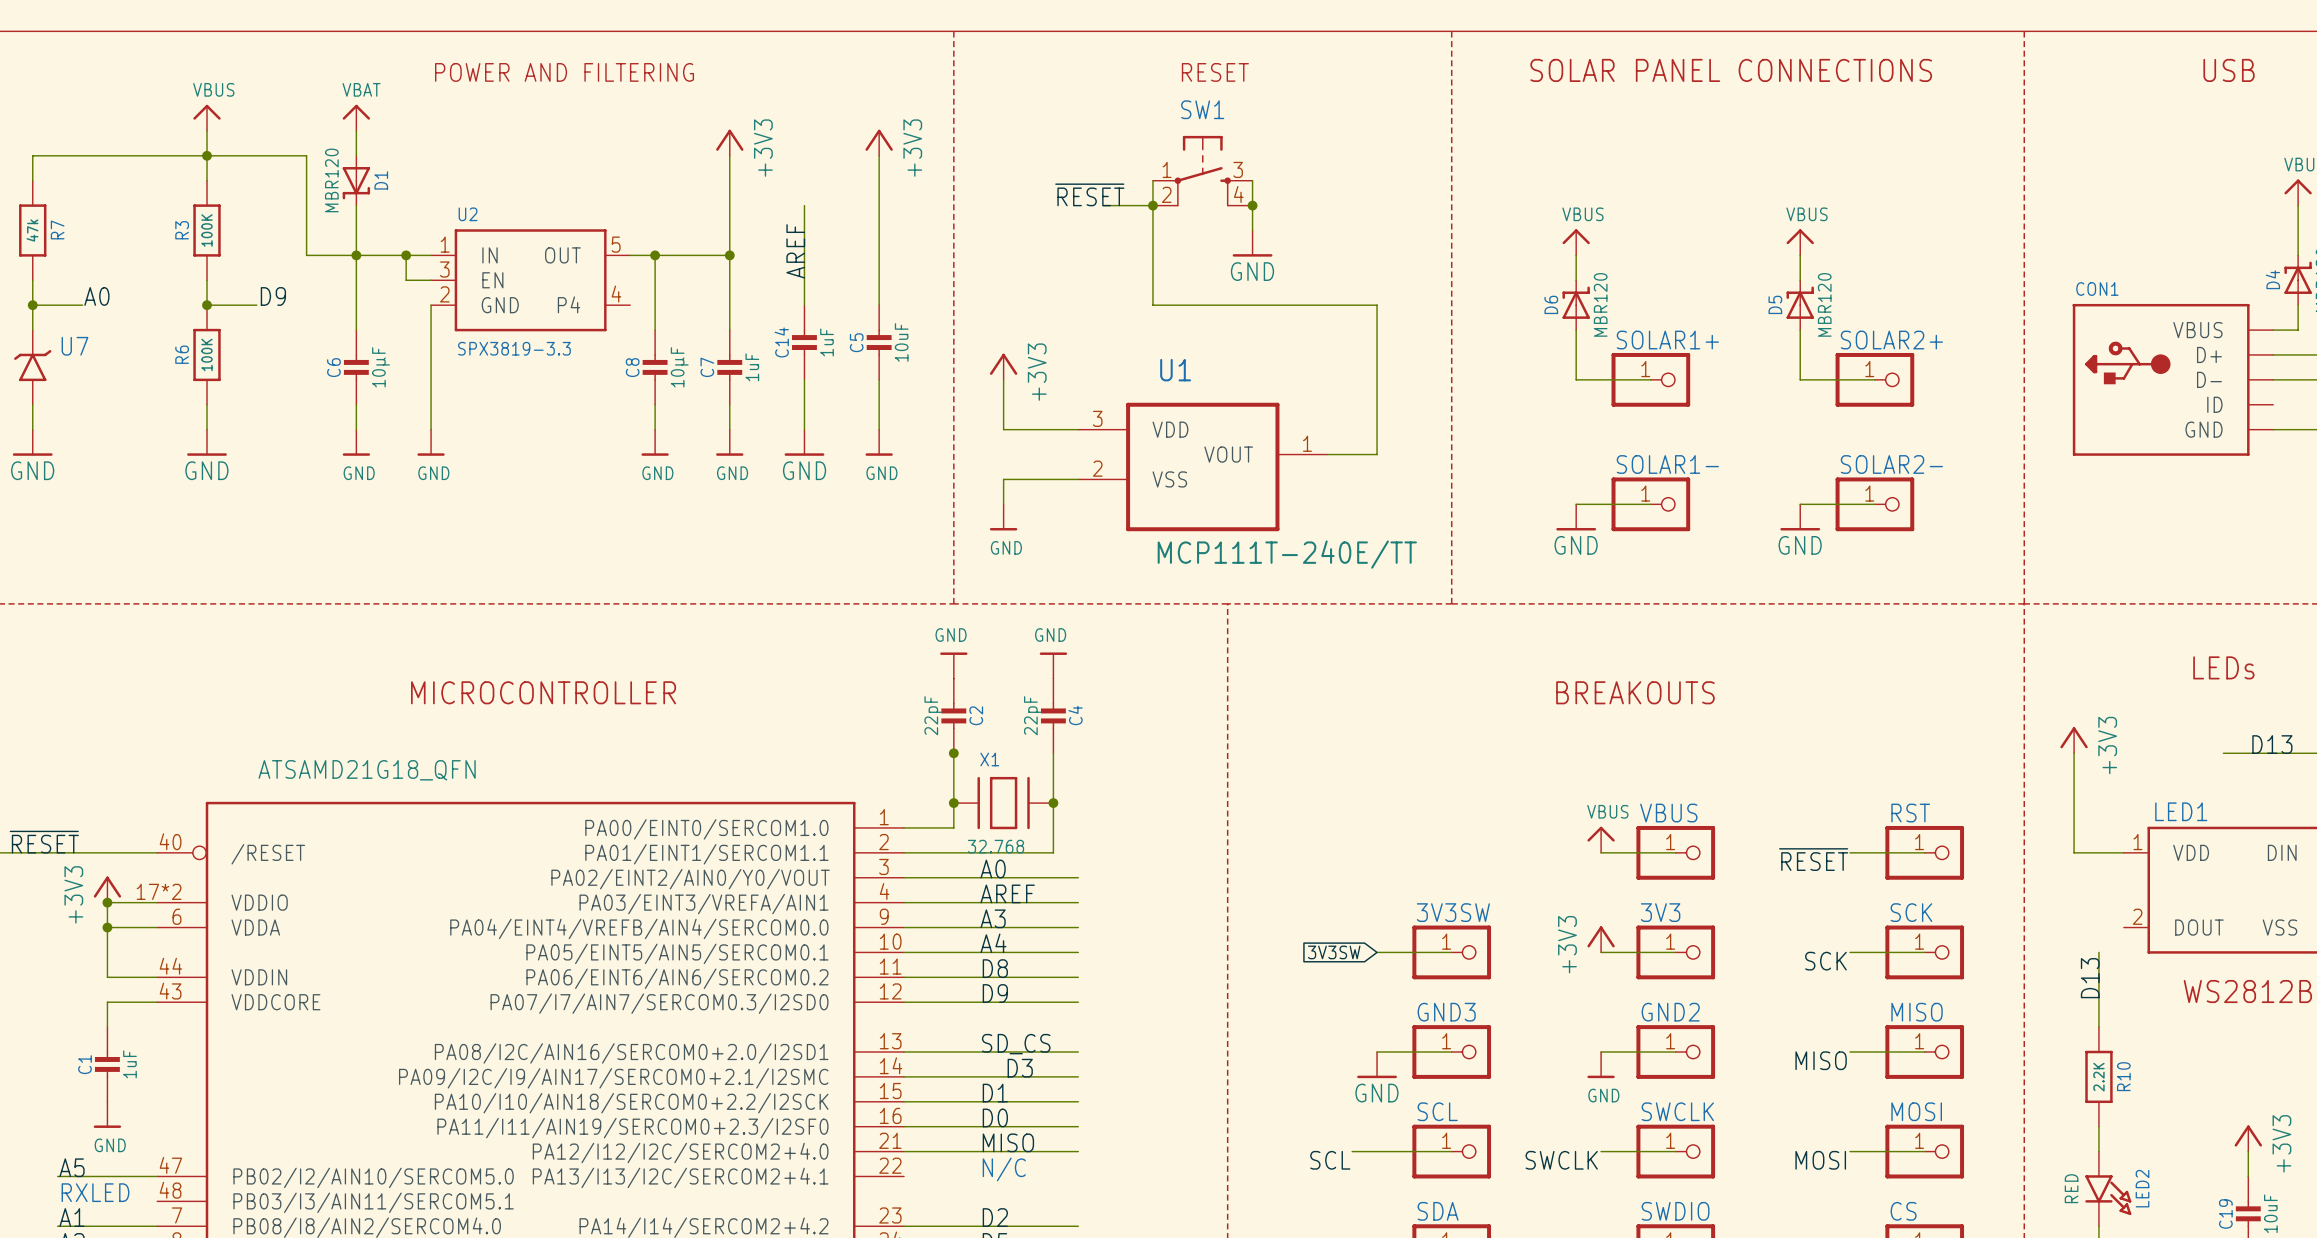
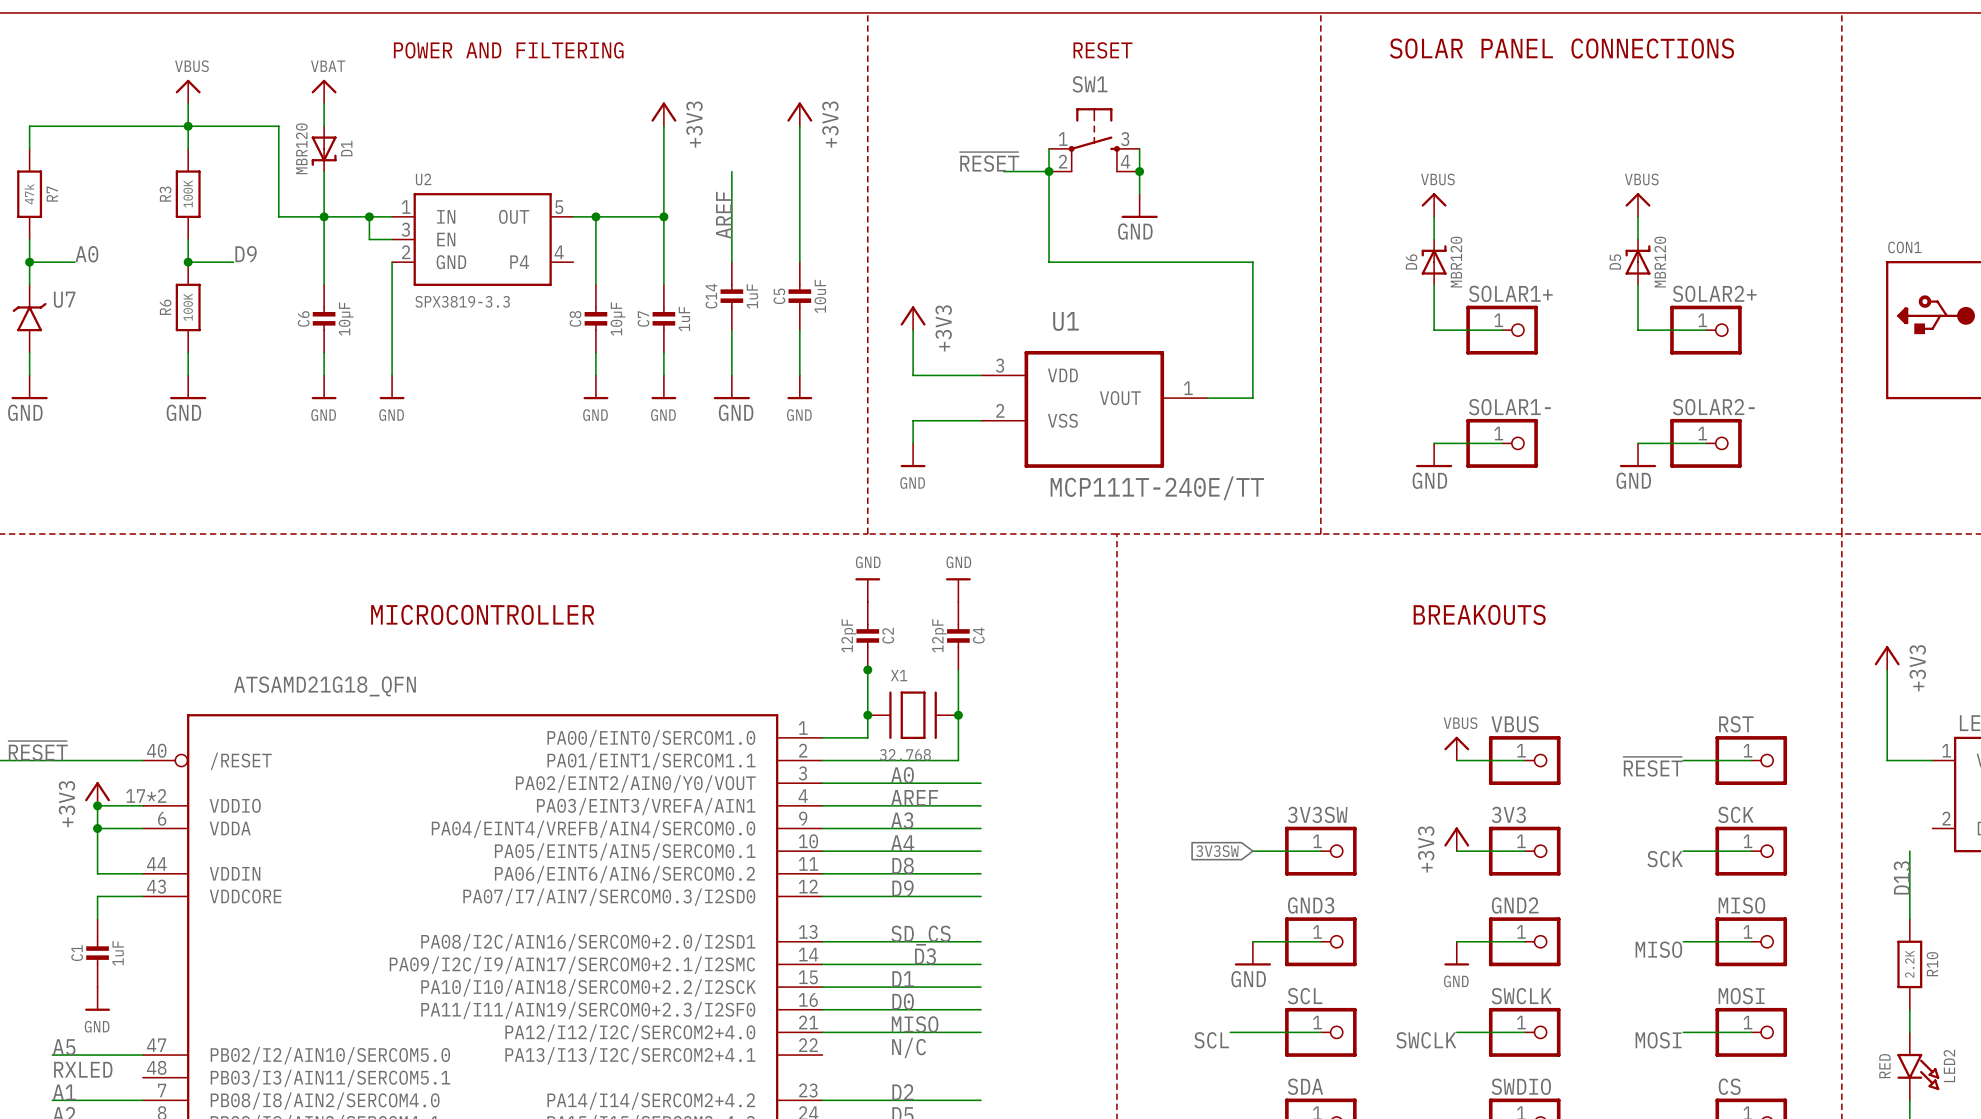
C2 value: 22pF (933, 715) -> 12pF (848, 635)
C4 value: 22pF (1032, 715) -> 12pF (939, 635)

